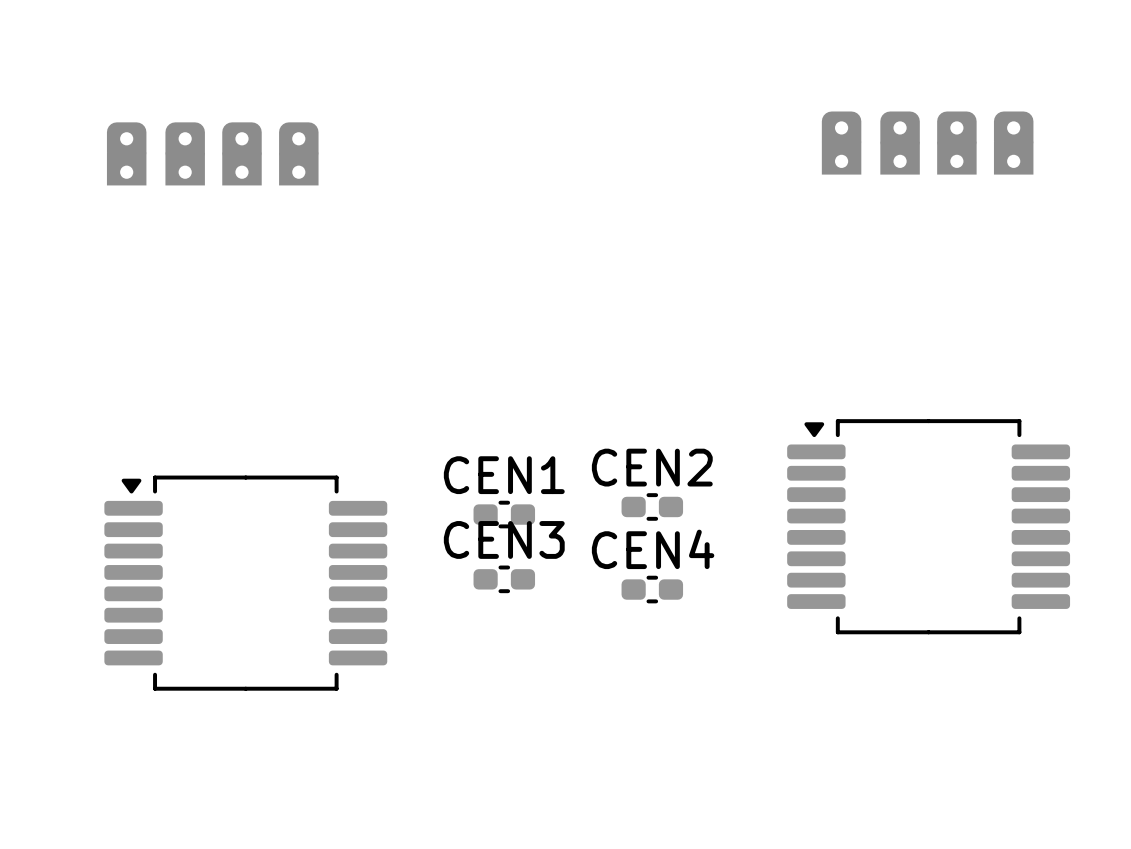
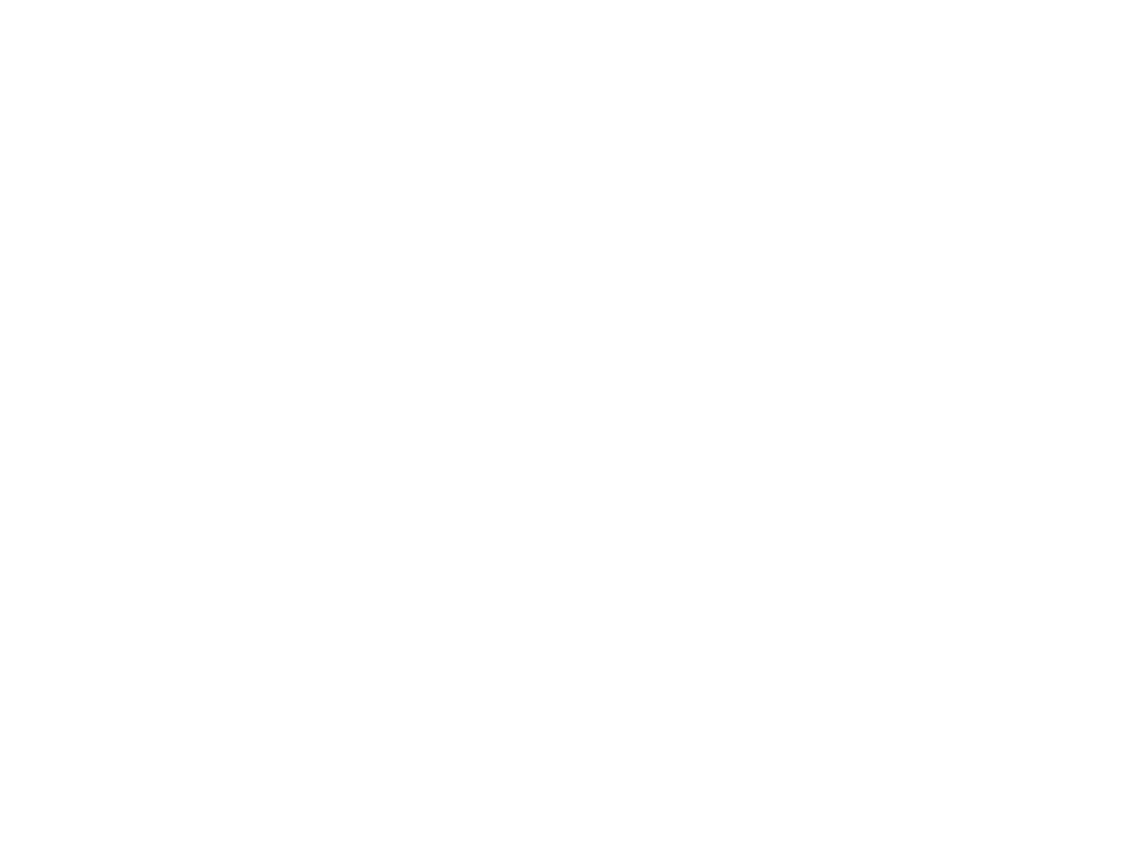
part: (927, 143) -> none
part: (212, 153) -> none
CEN2: (652, 506) -> none
CEN1: (504, 514) -> none
part: (928, 526) -> none
CEN3: (504, 579) -> none
part: (245, 583) -> none
CEN4: (652, 589) -> none

